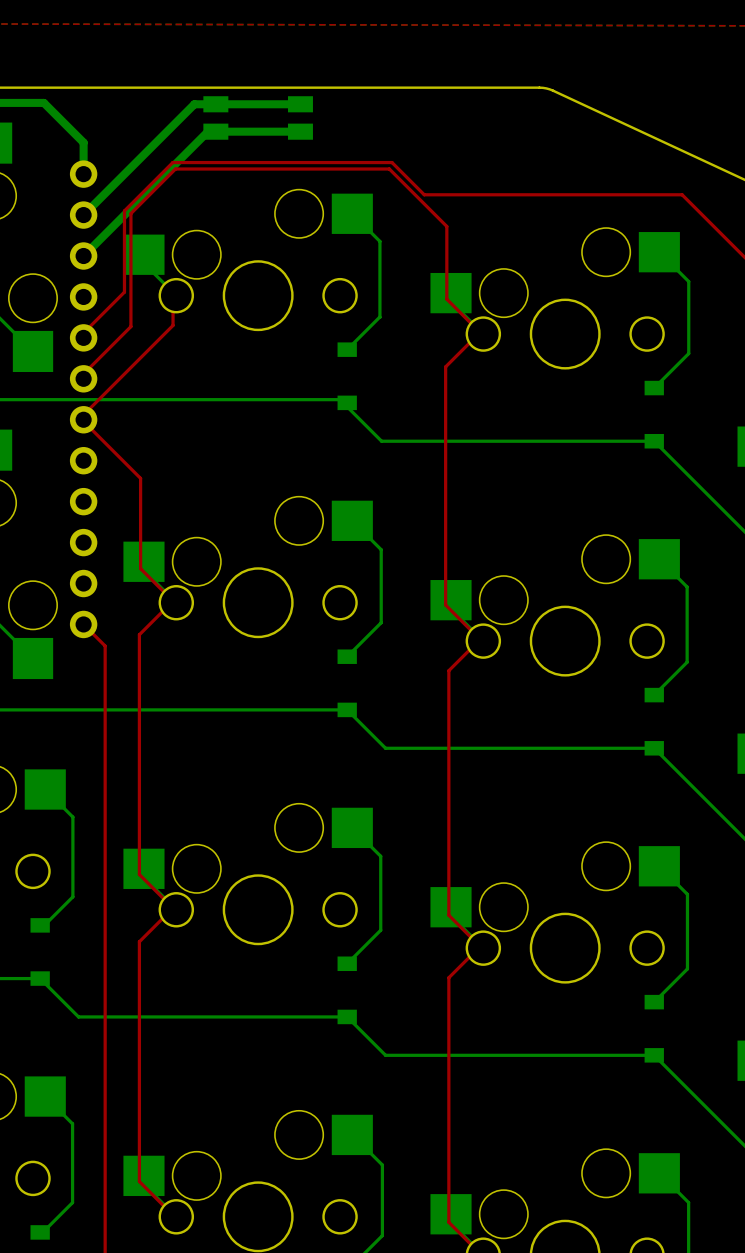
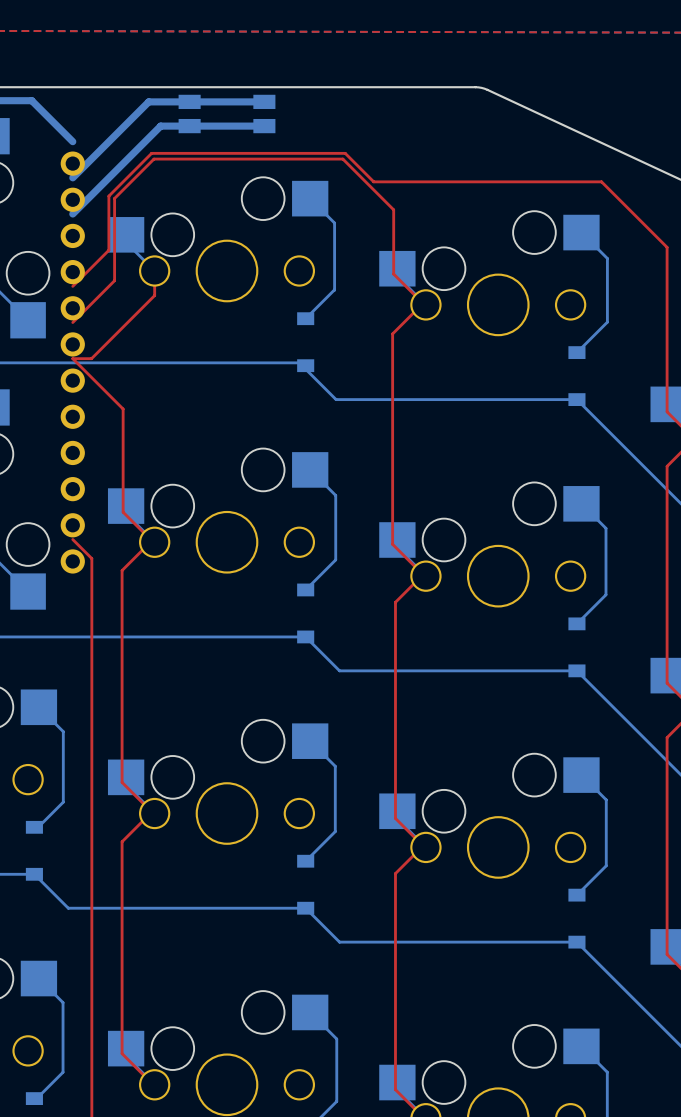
bottom track: (37, 102) (43, 102) (83, 142) (83, 174) -> (31, 100) (72, 141)
bottom track: (194, 104) (83, 215) -> (170, 101) (148, 101) (72, 177)
bottom track: (207, 131) (83, 256) -> (182, 126) (160, 126) (72, 214)
top track: (124, 272) (124, 292) (80, 336) -> (108, 250) (72, 286)
top track: (173, 294) (173, 325) (80, 418) (140, 478) -> (154, 270) (154, 295) (91, 358) (72, 358) (123, 409) (123, 432)
top track: (130, 306) (130, 326) (80, 377) -> (114, 280) (72, 322)
top track: (83, 624) (105, 646) -> (72, 539) (91, 558) (91, 580)

